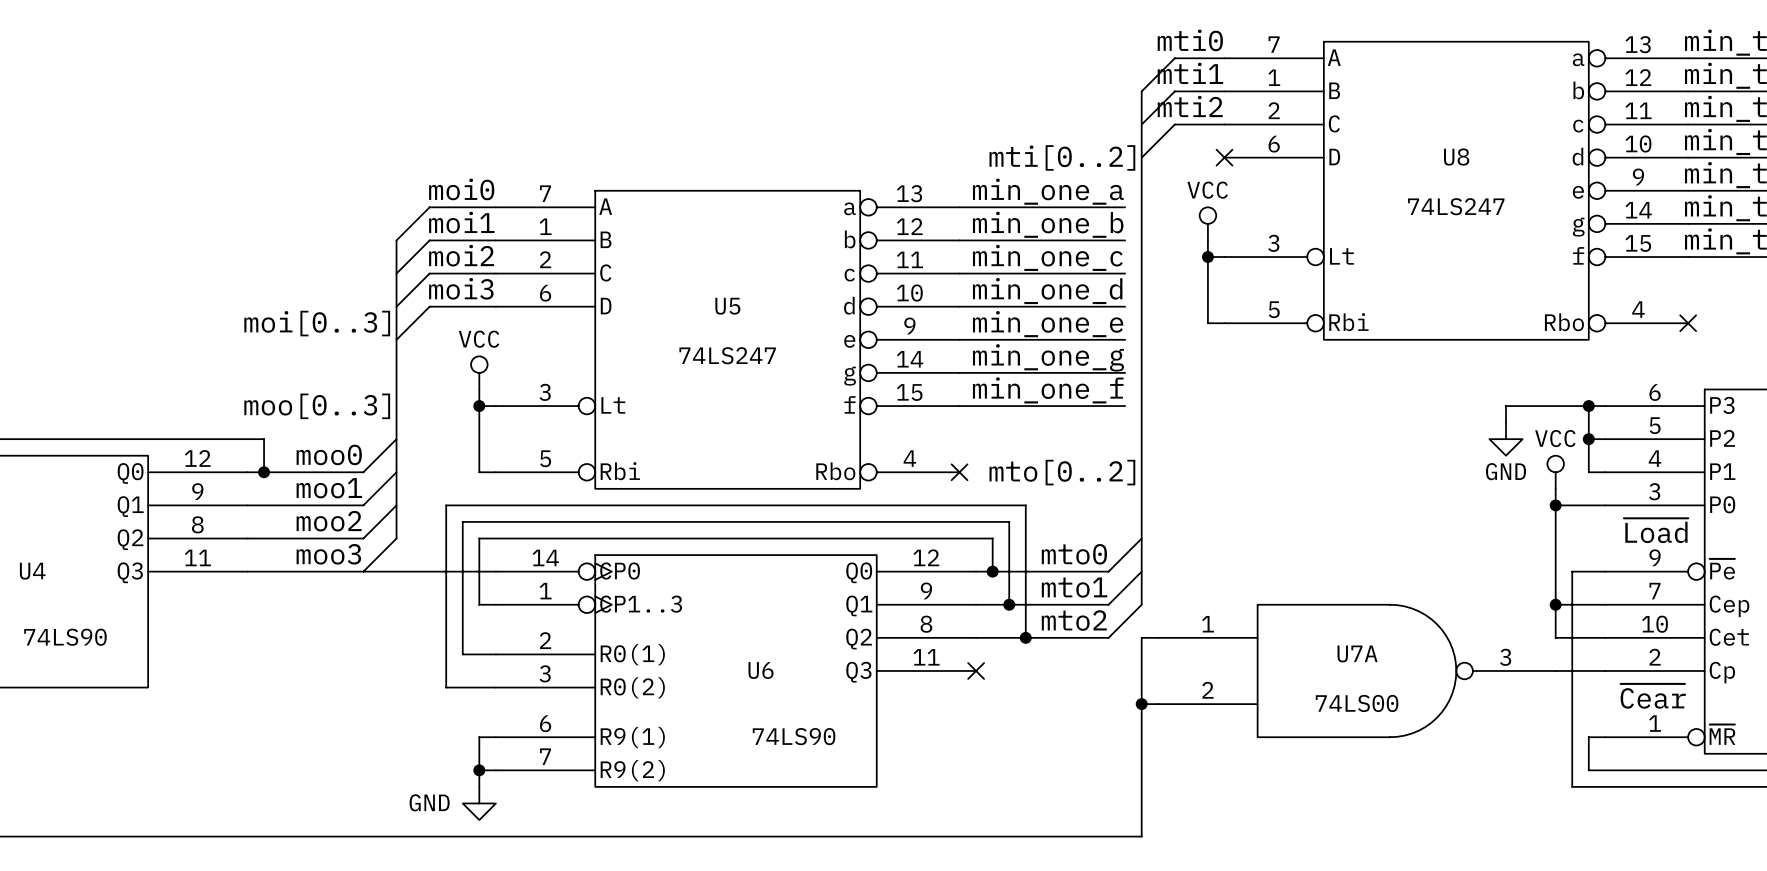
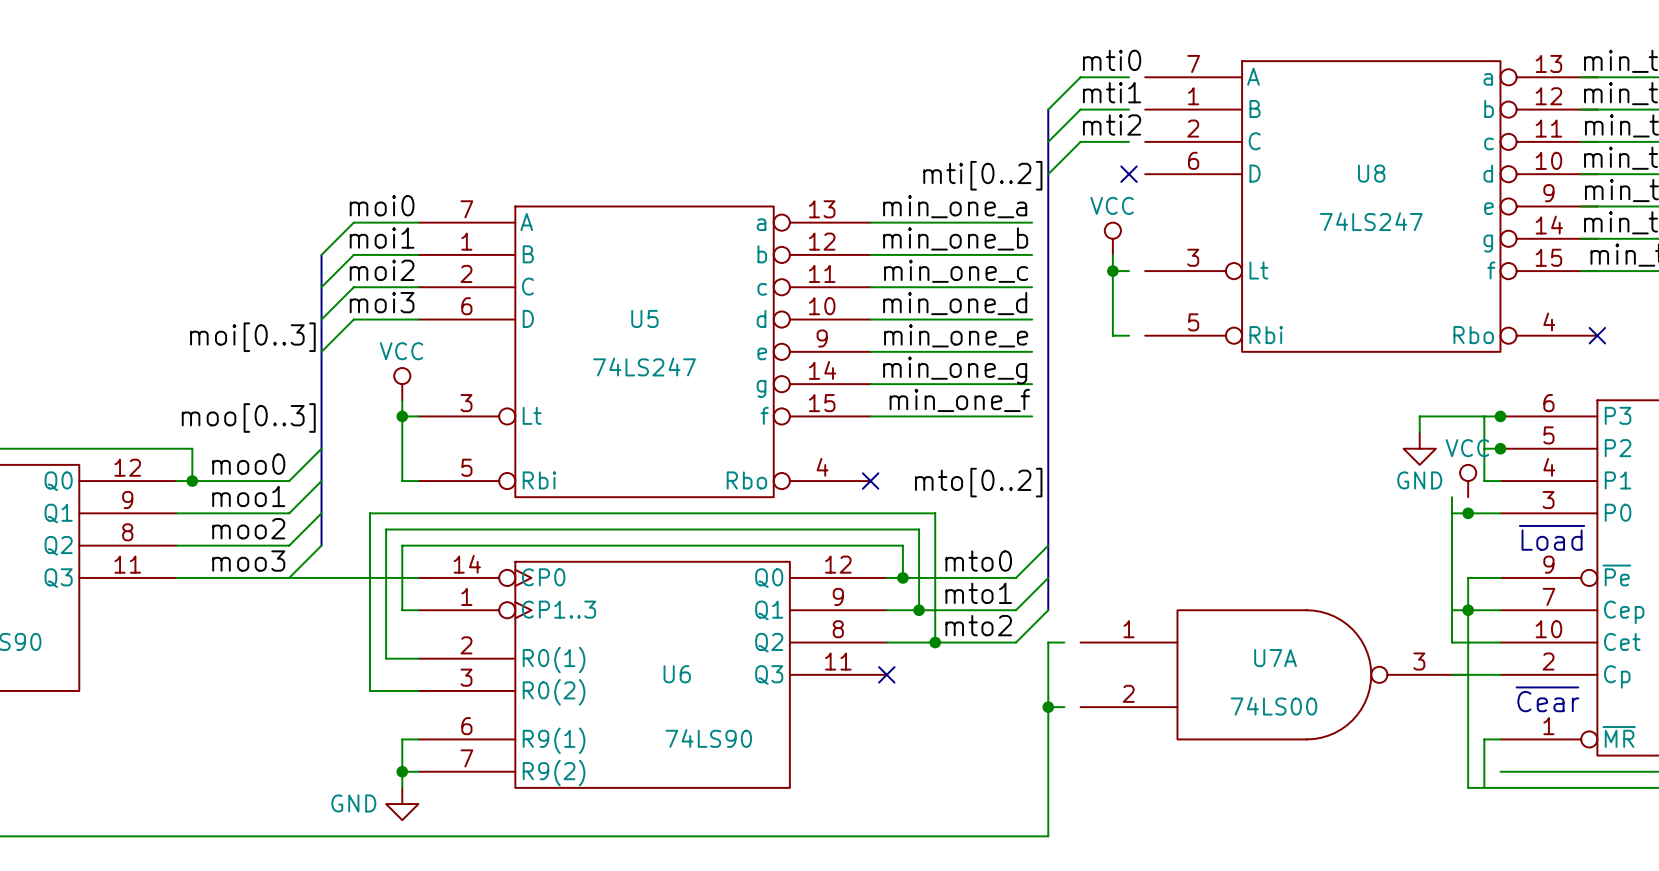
label position: mti0 (1190, 40) -> mti0 (1112, 60)
label position: mti1 (1190, 73) -> mti1 (1112, 92)
label position: mti2 (1190, 106) -> mti2 (1112, 124)
U8 position: (1456, 190) -> (1371, 206)
no-connect mark position: (1688, 323) -> (1597, 335)
wire: (1522, 406) (1506, 406) (1506, 422) -> (1419, 416) (1419, 432)
junction position: (1588, 406) -> (1500, 416)
power symbol position: GND (1506, 439) -> GND (1419, 448)
junction position: (1588, 439) -> (1500, 448)
power symbol position: VCC (1555, 472) -> VCC (1468, 481)
junction position: (1555, 505) -> (1468, 513)
junction position: (1555, 604) -> (1468, 610)
U7A position: (1356, 670) -> (1274, 674)
wire: (1588, 770) (1605, 770) -> (1484, 771) (1484, 787)

